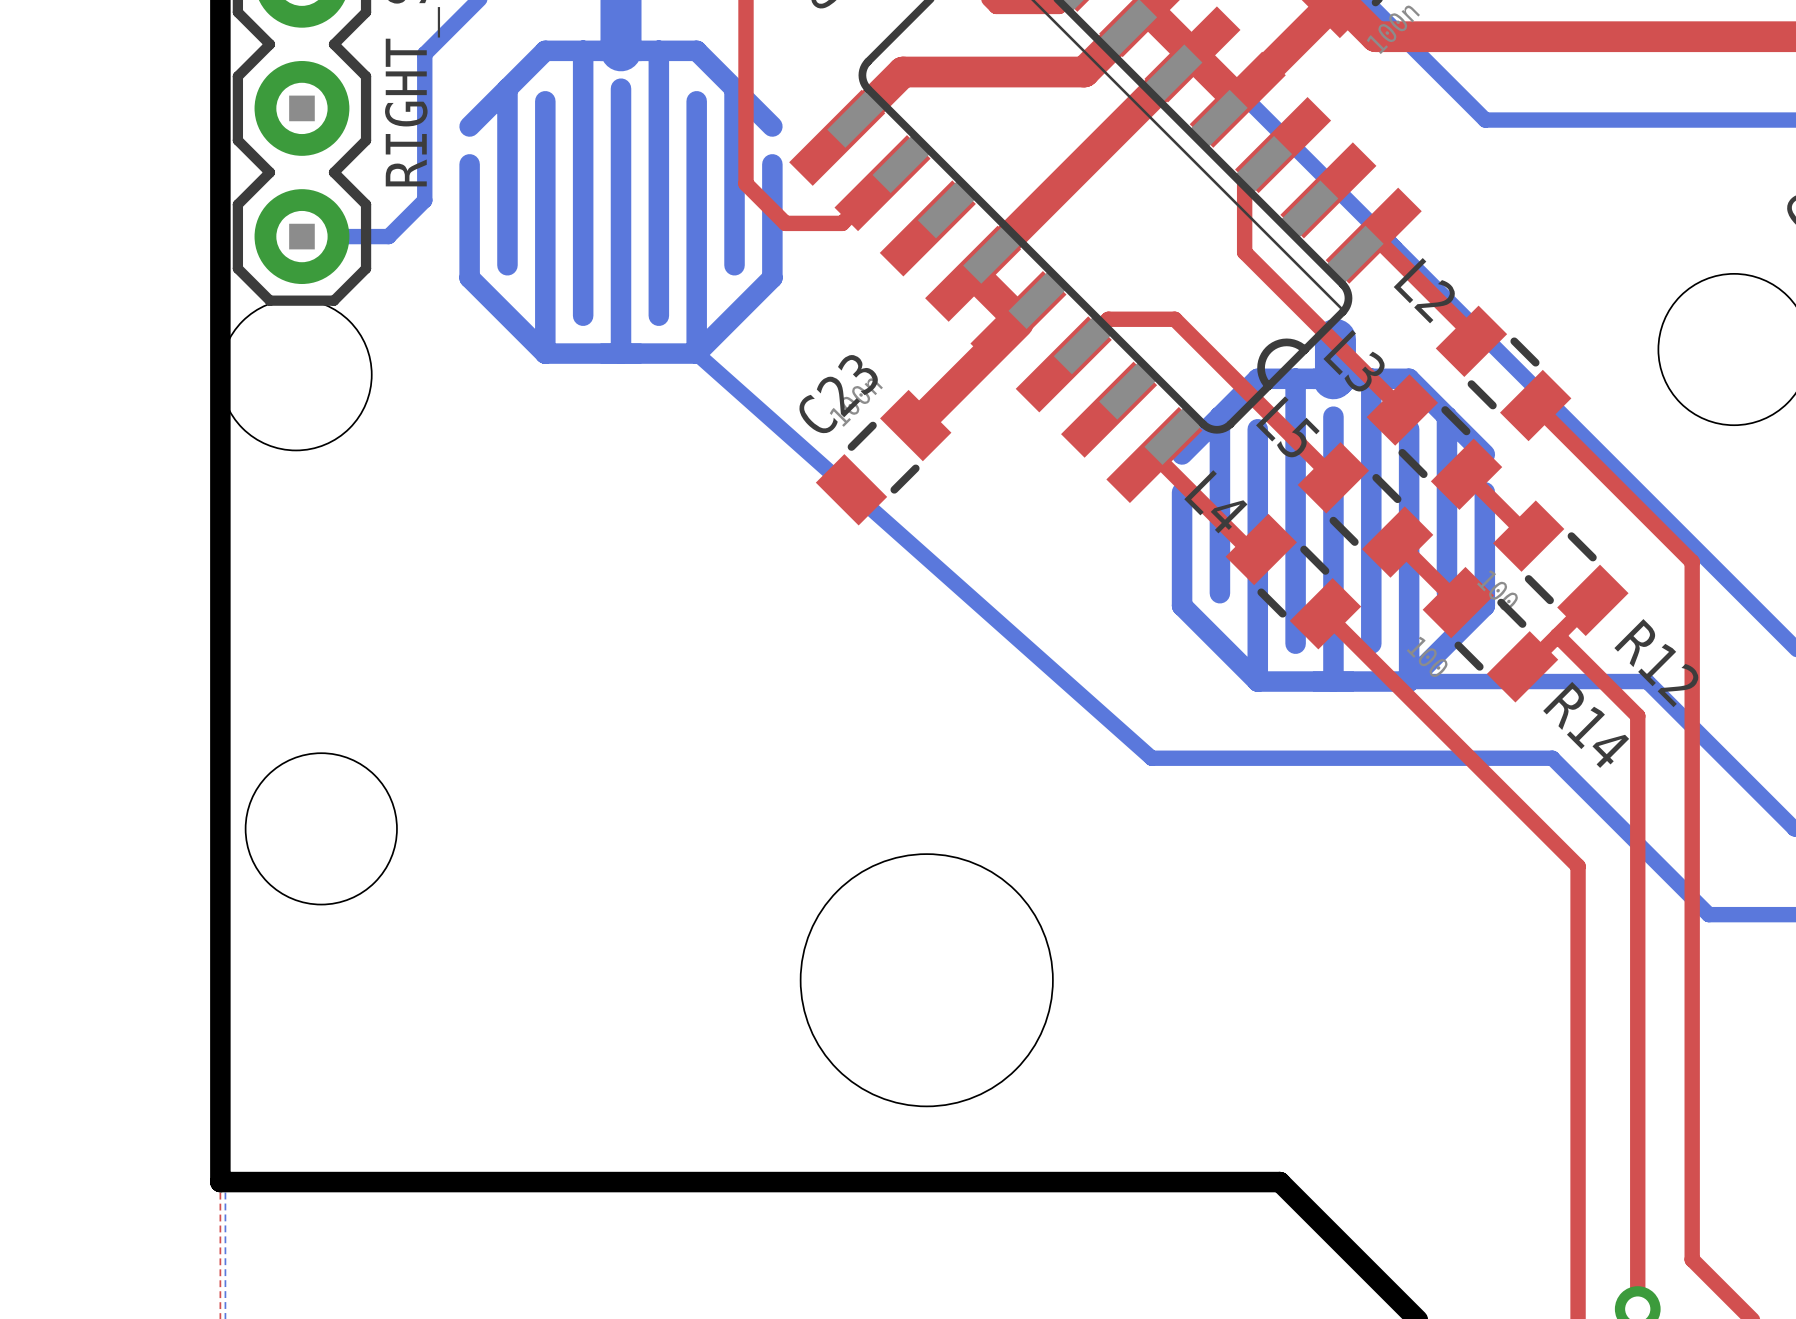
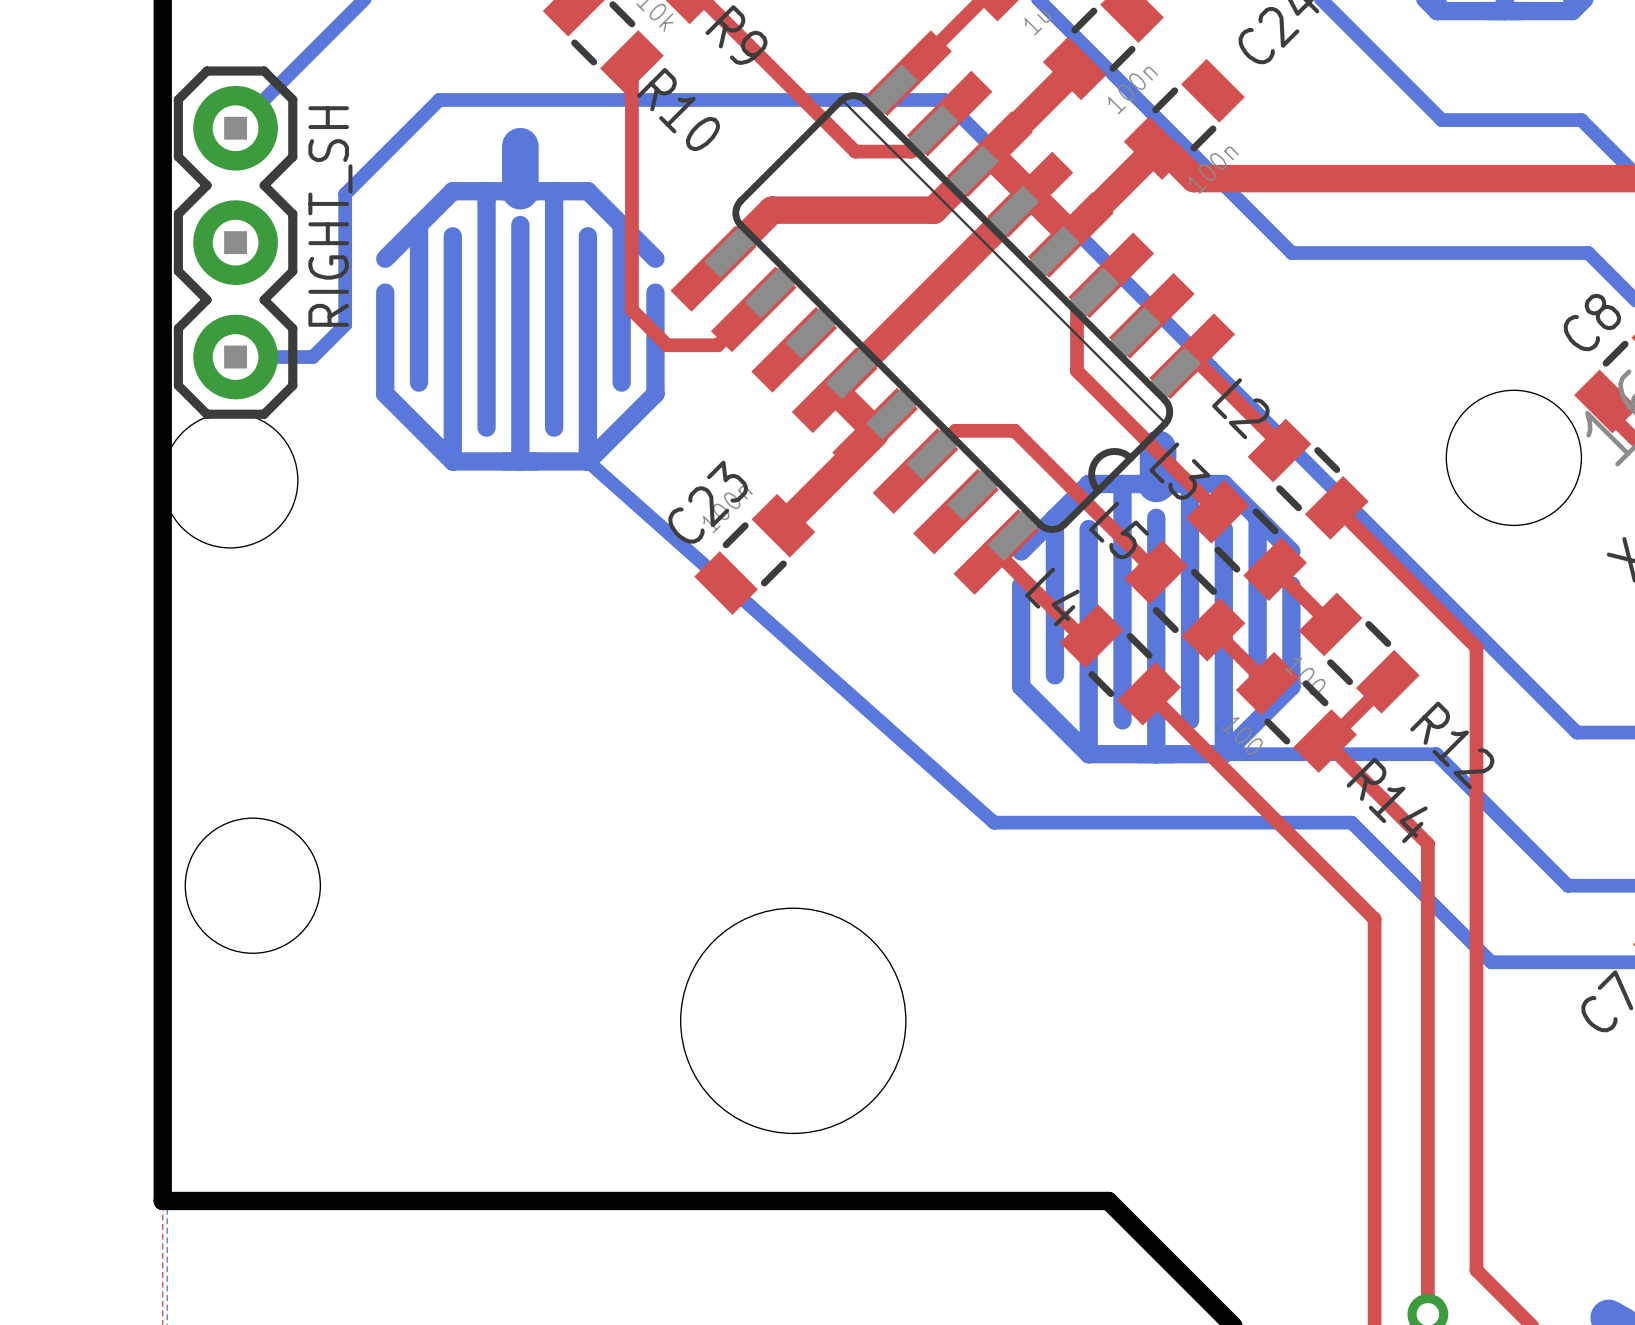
top track: (1557, 635) (1637, 715) (1637, 782) -> (1325, 741) (1427, 843)

